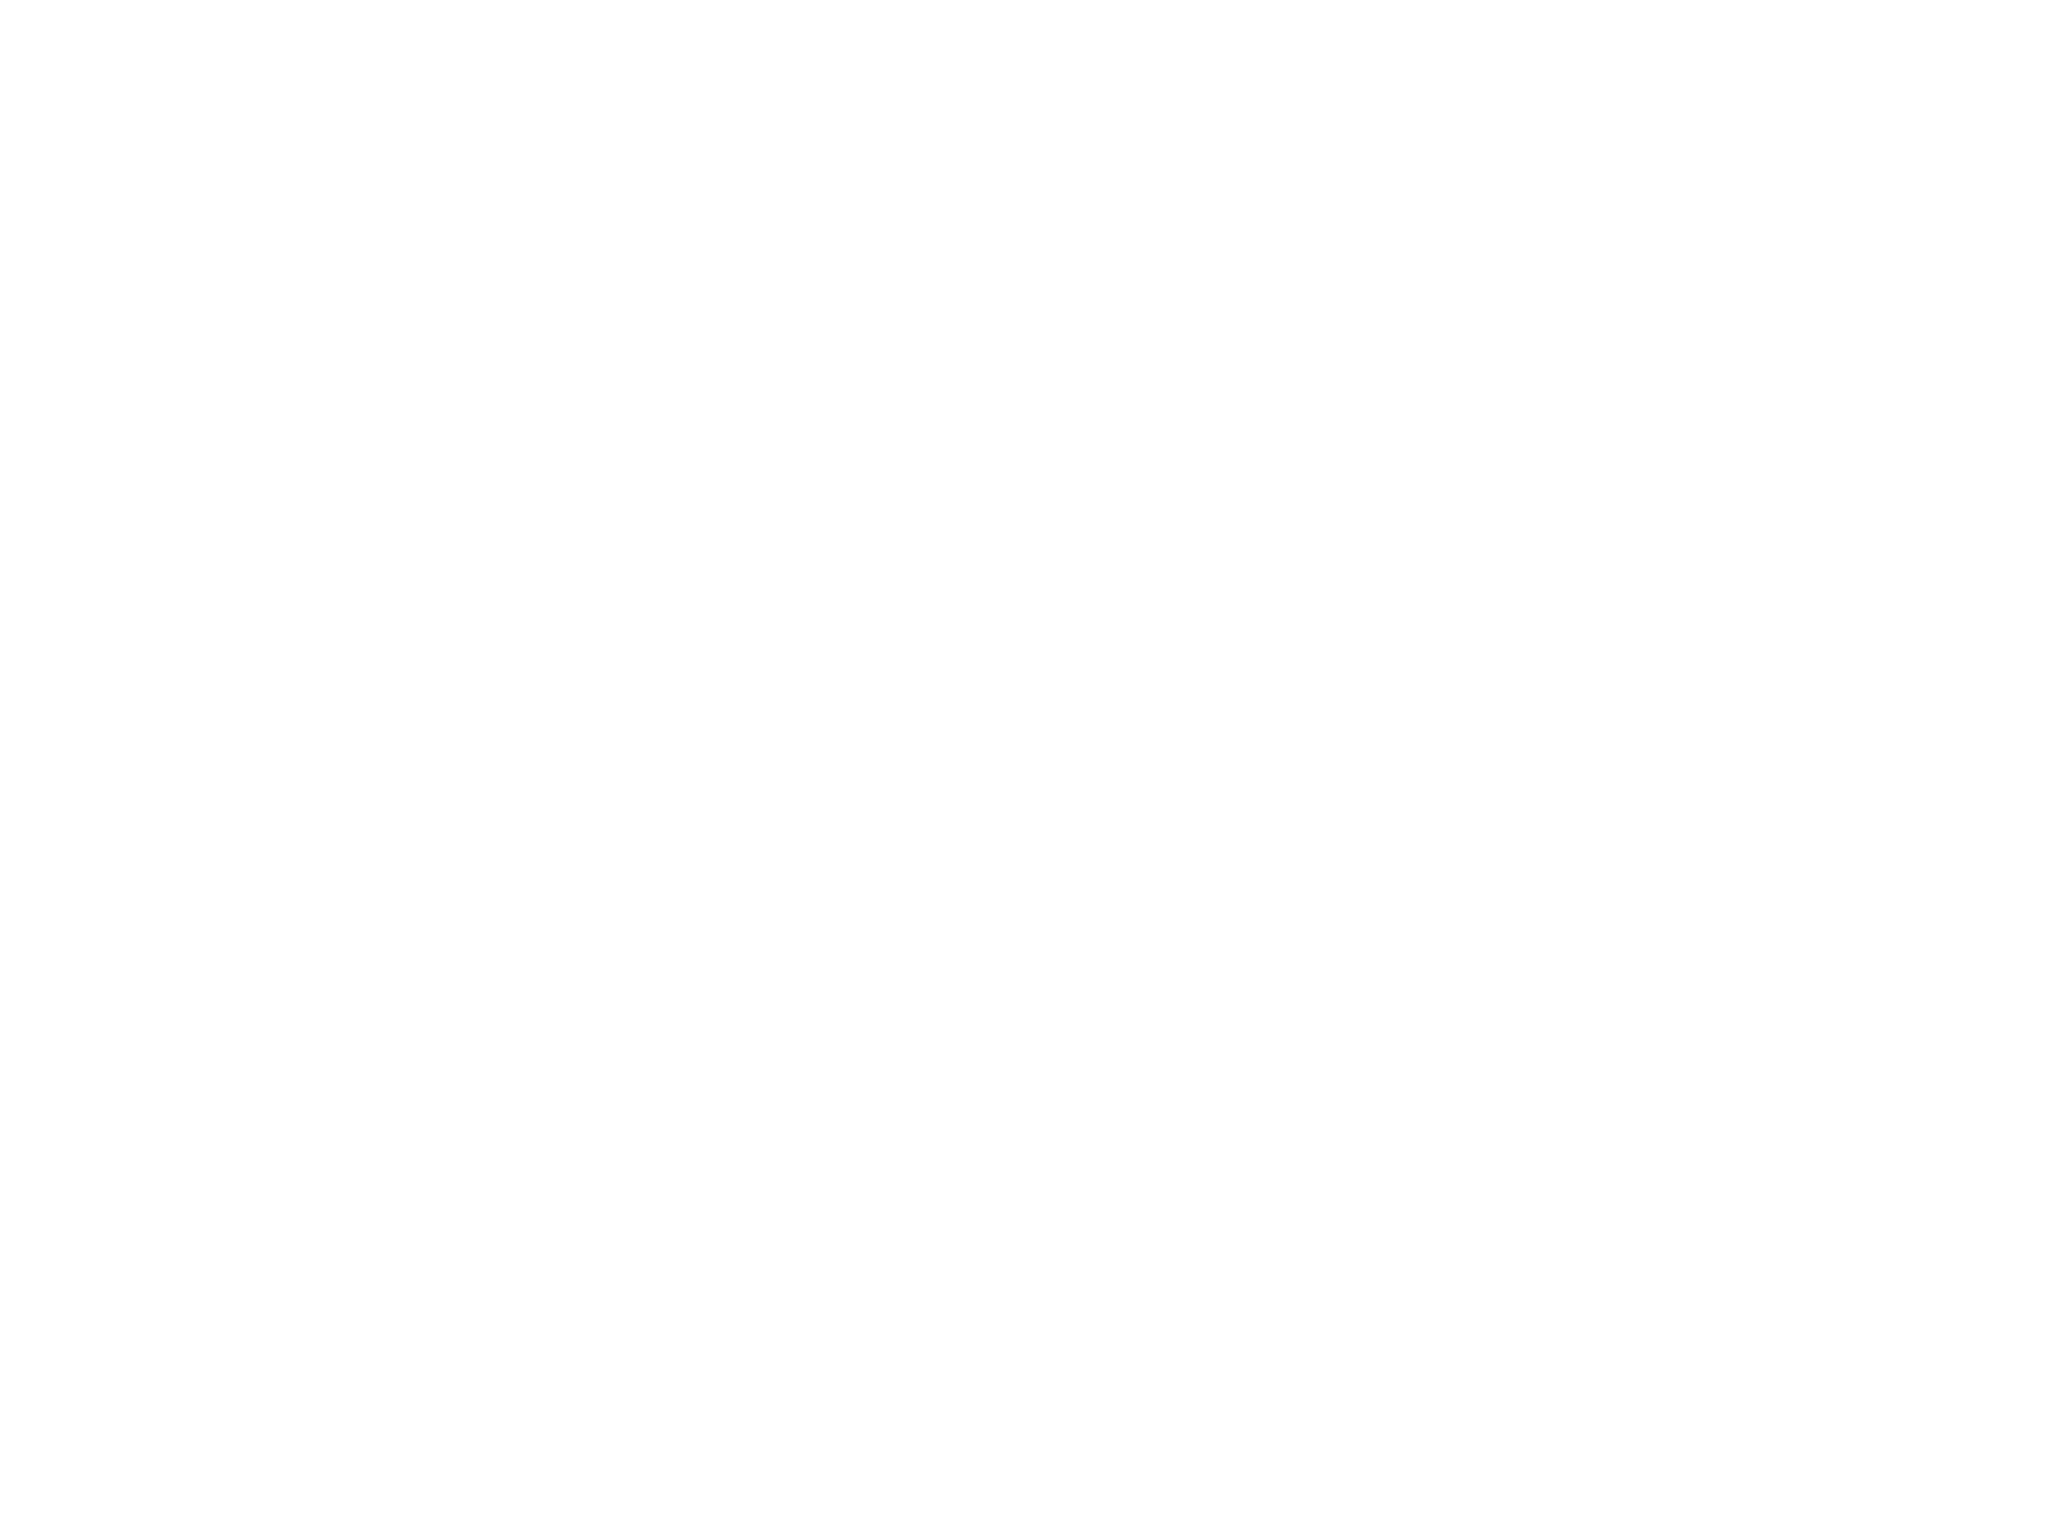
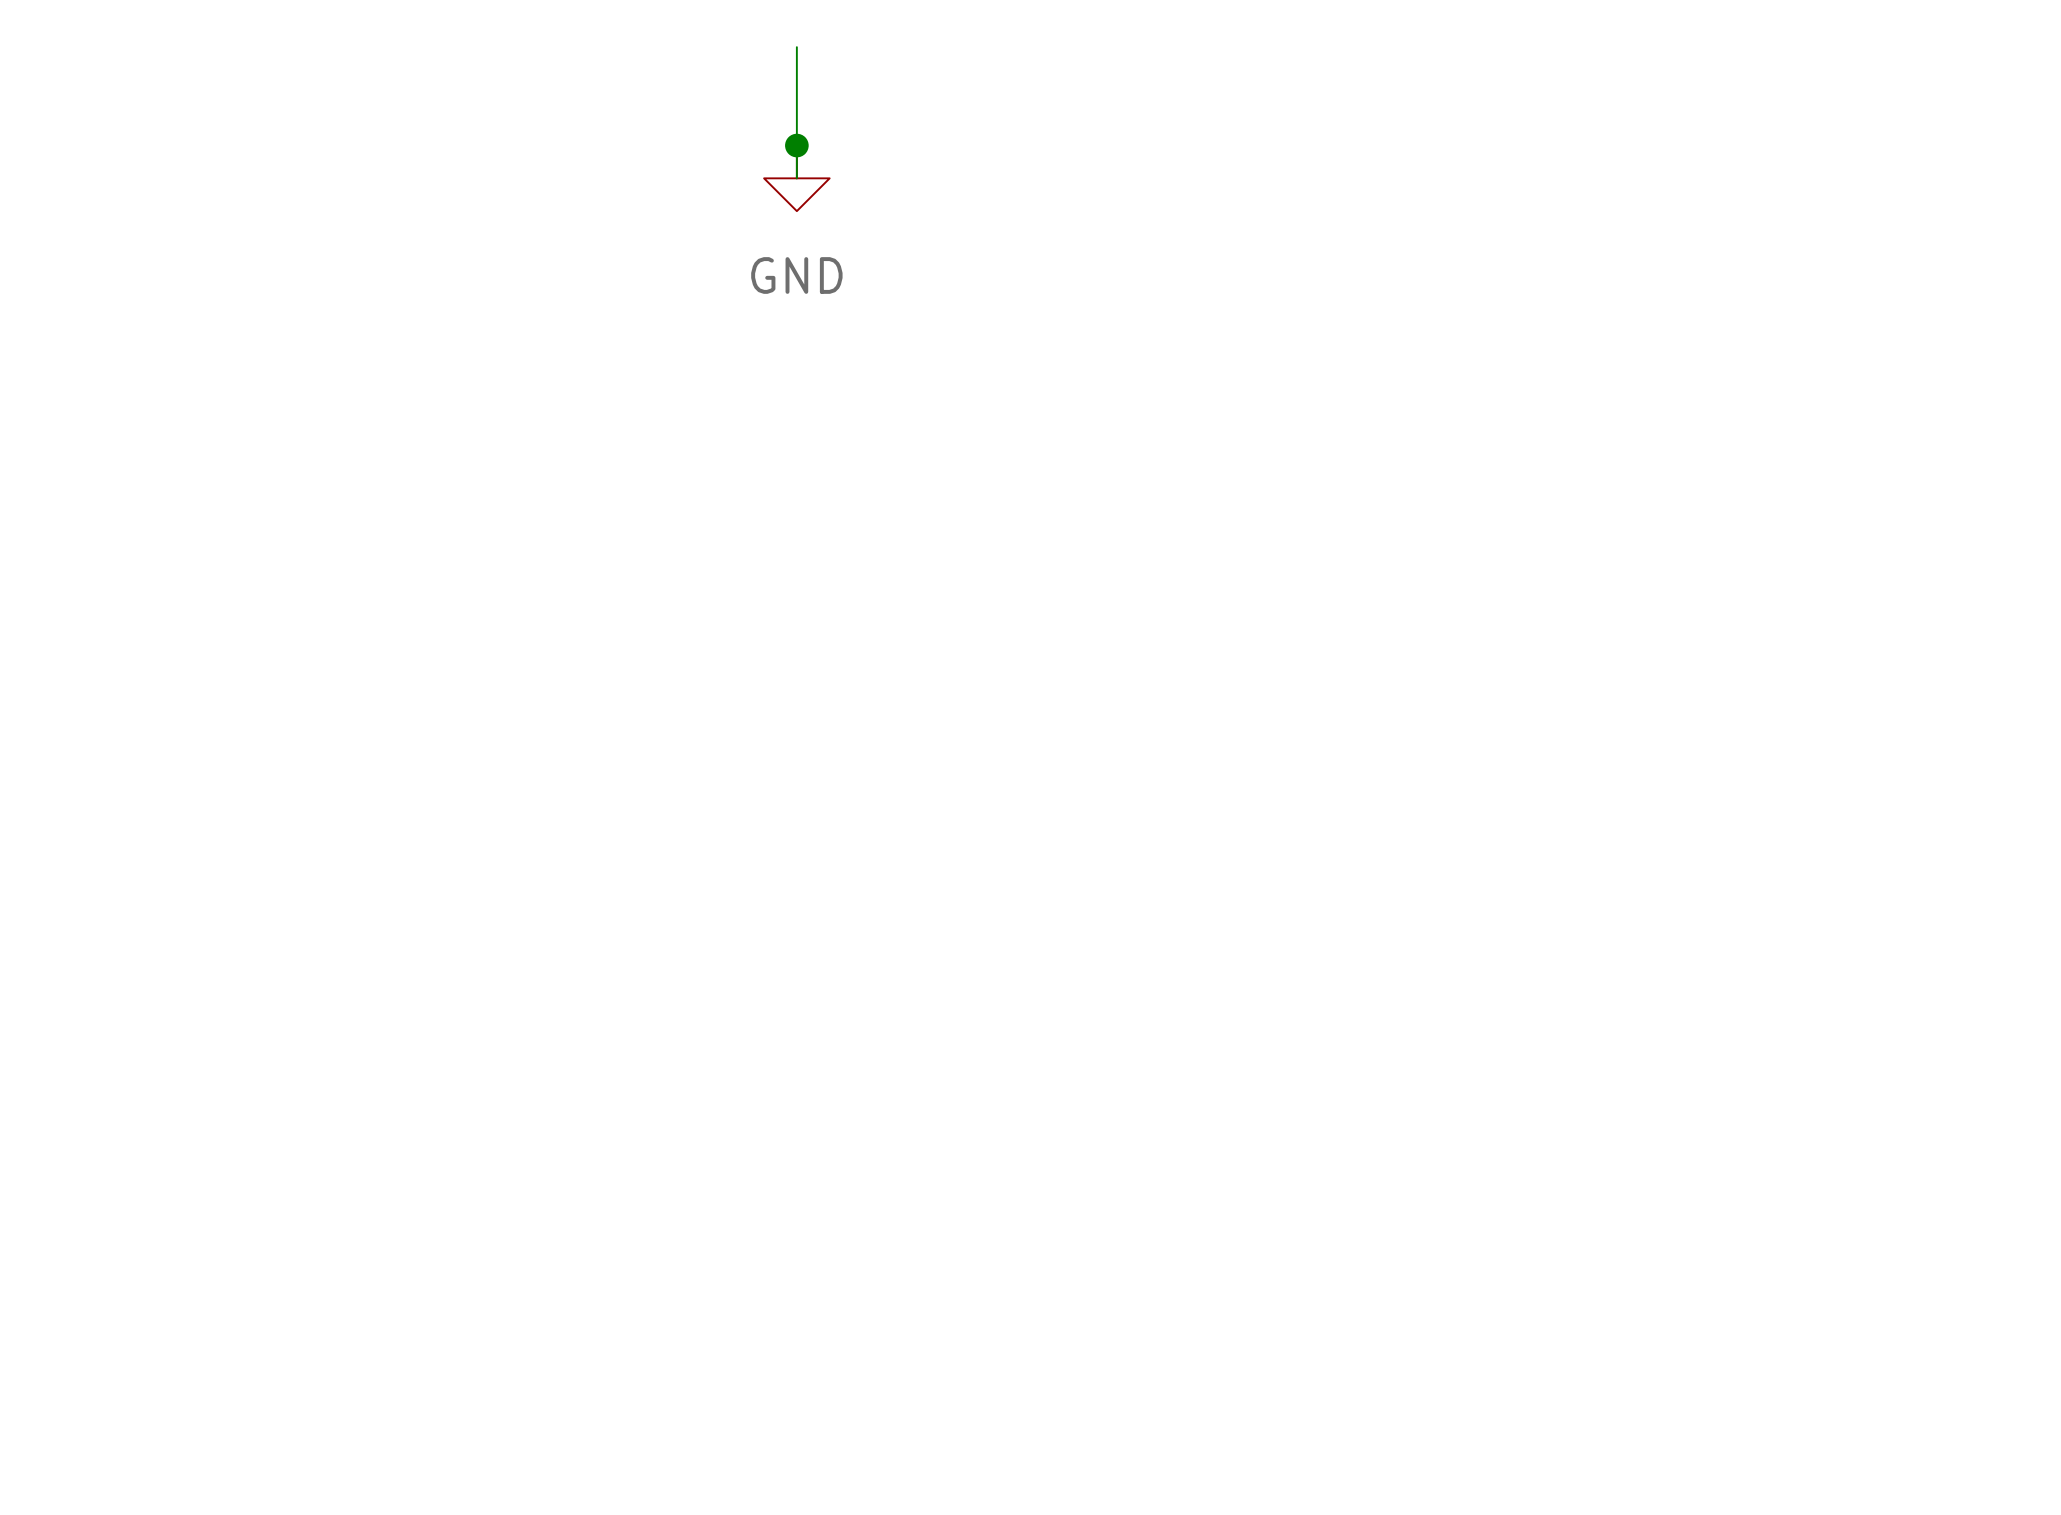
wire: none -> (796, 47) (796, 178)
junction: none -> (796, 145)
power symbol: none -> GND (796, 178)

